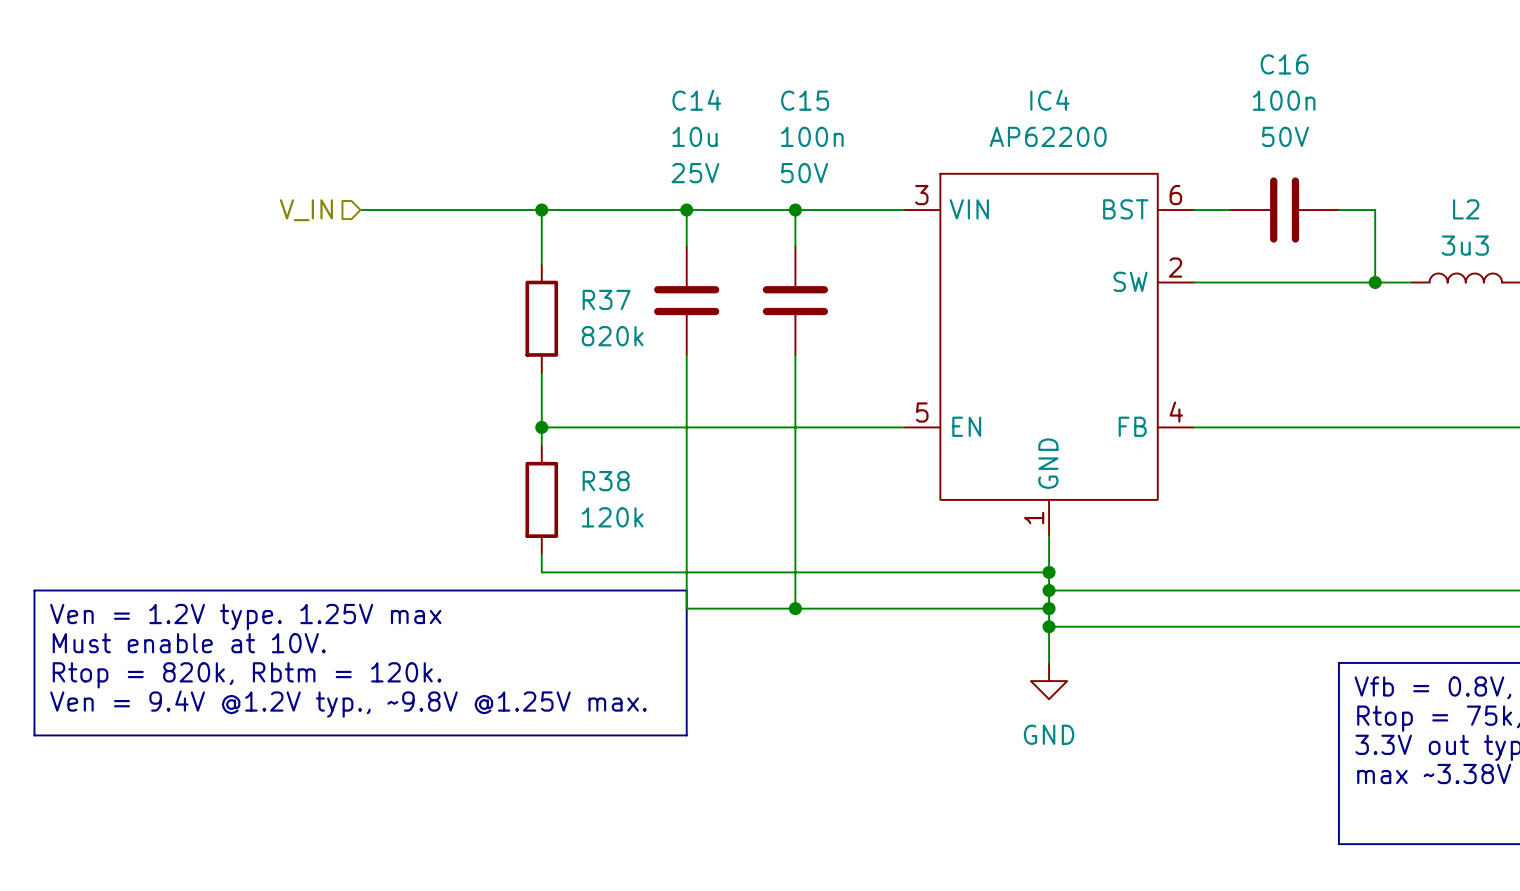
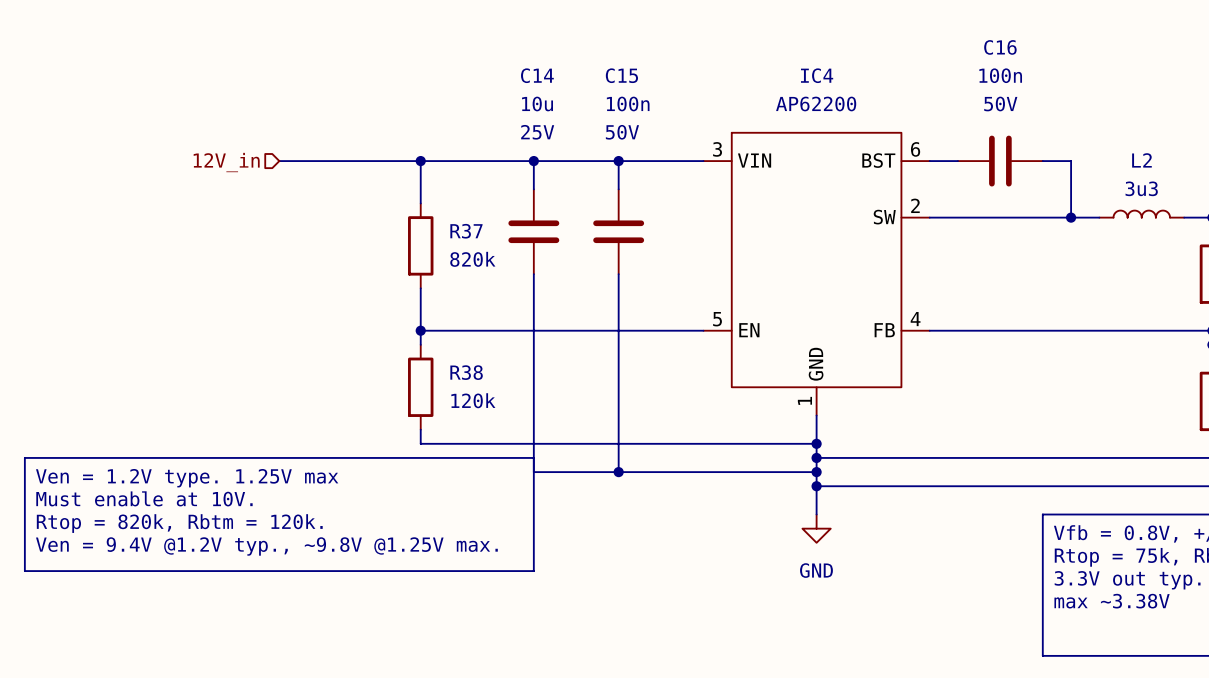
hierarchical label: V_IN (306, 210) -> 12V_in (226, 162)

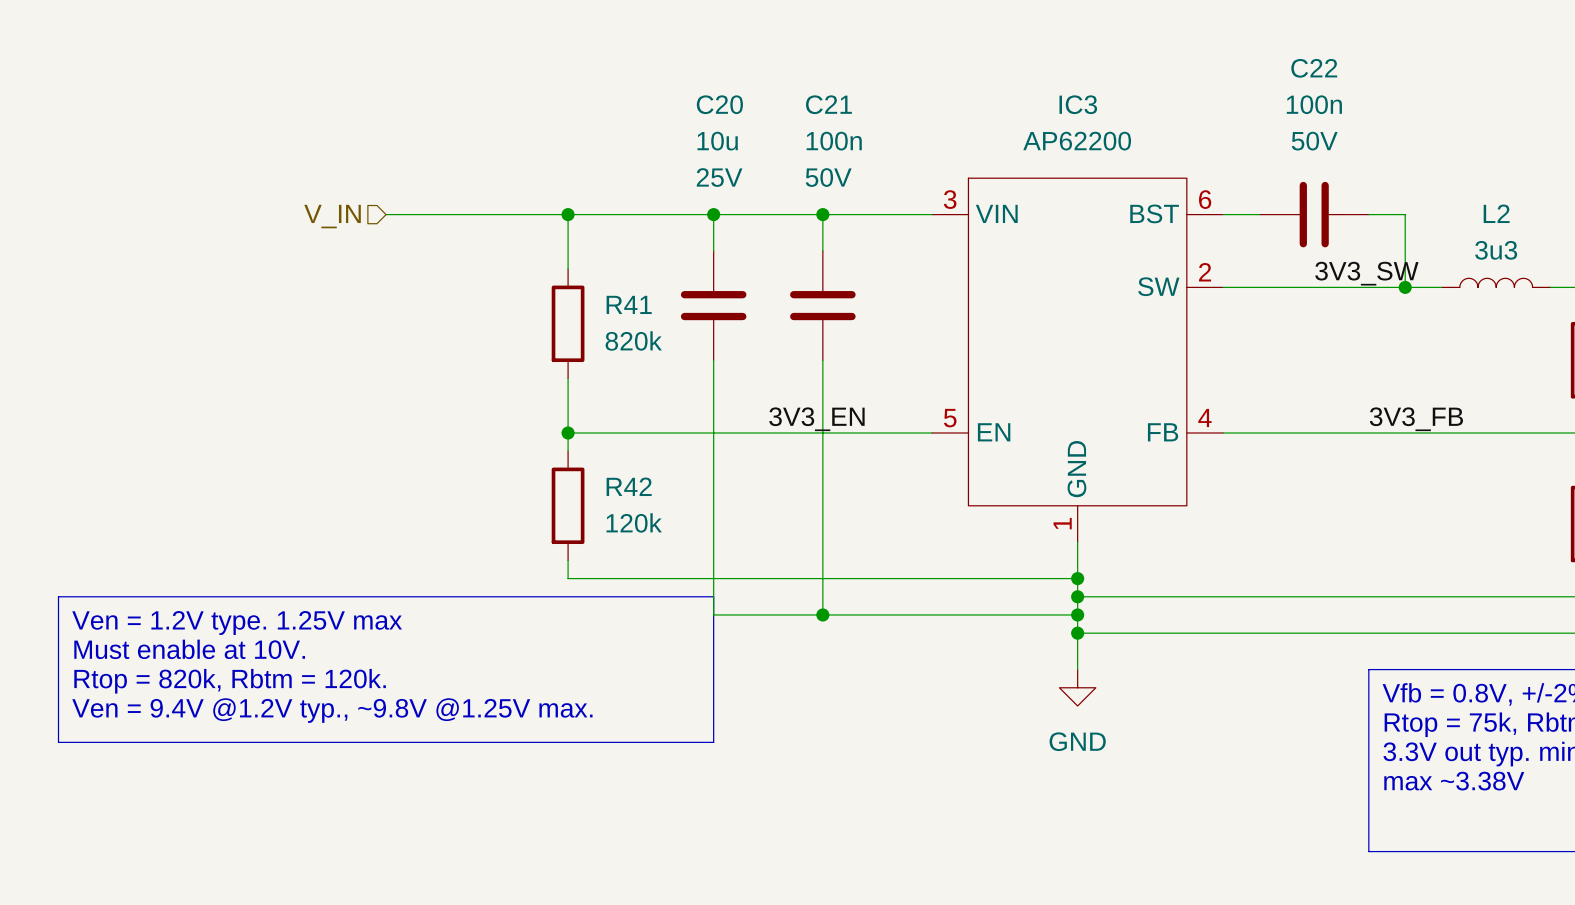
C16 name: C16 (1000, 47) -> C22 (1314, 68)
C14 name: C14 (537, 75) -> C20 (719, 104)
C15 name: C15 (621, 75) -> C21 (828, 104)
IC4 name: IC4 (817, 75) -> IC3 (1078, 104)
hierarchical label: 12V_in (226, 162) -> V_IN (332, 216)
label: none -> 3V3_SW (1366, 273)
R37 name: R37 (466, 231) -> R41 (629, 304)
label: none -> 3V3_EN (816, 419)
label: none -> 3V3_FB (1416, 419)
R38 name: R38 (466, 372) -> R42 (629, 486)

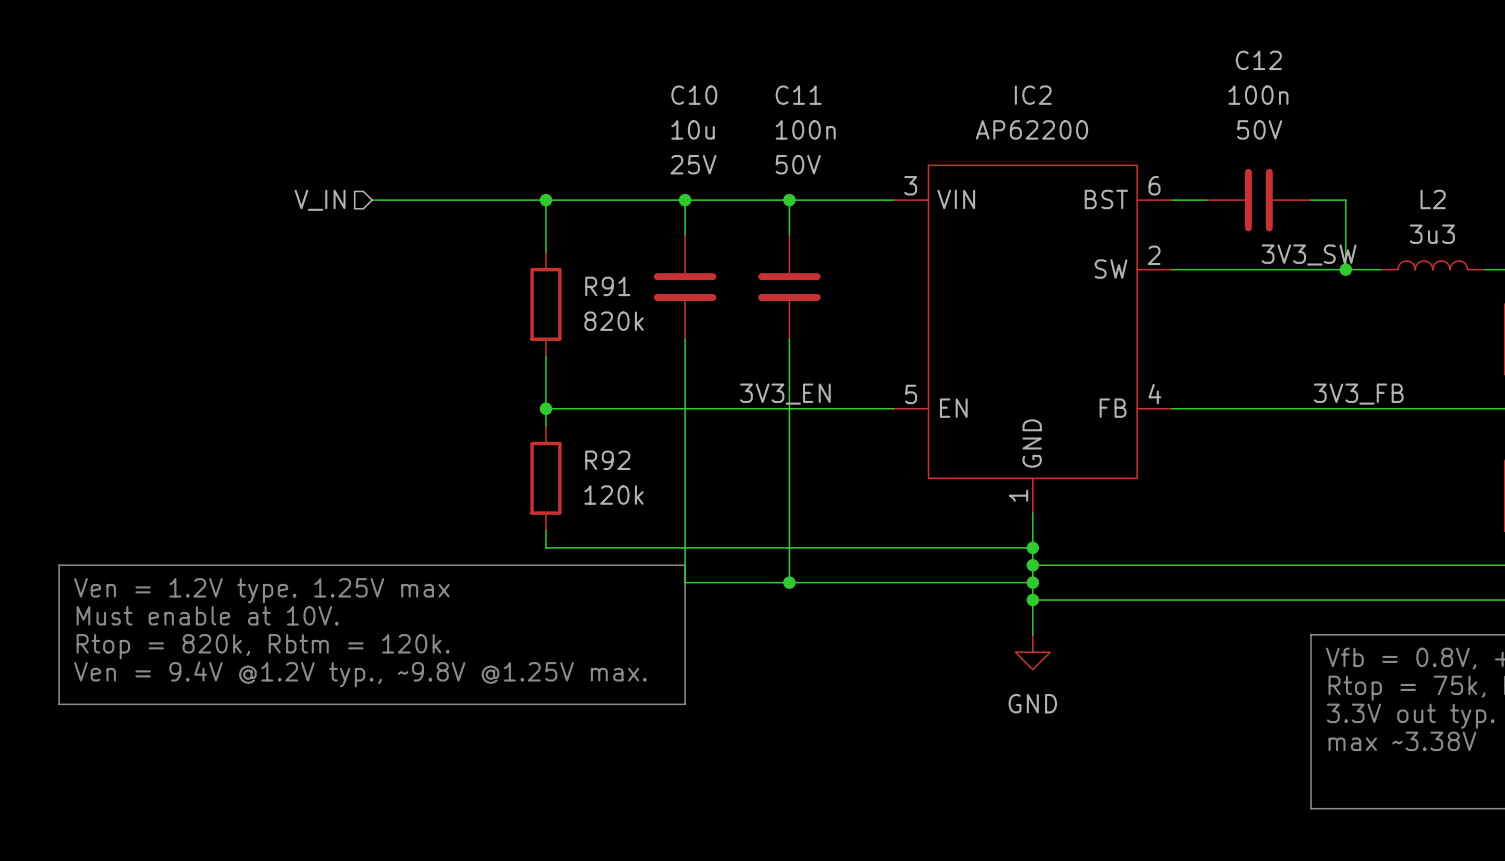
C22 name: C22 (1314, 68) -> C12 (1258, 60)
C20 name: C20 (719, 104) -> C10 (694, 95)
C21 name: C21 (828, 104) -> C11 (798, 95)
IC3 name: IC3 (1078, 104) -> IC2 (1033, 95)
R41 name: R41 (629, 304) -> R91 (607, 286)
R42 name: R42 (629, 486) -> R92 (607, 460)

